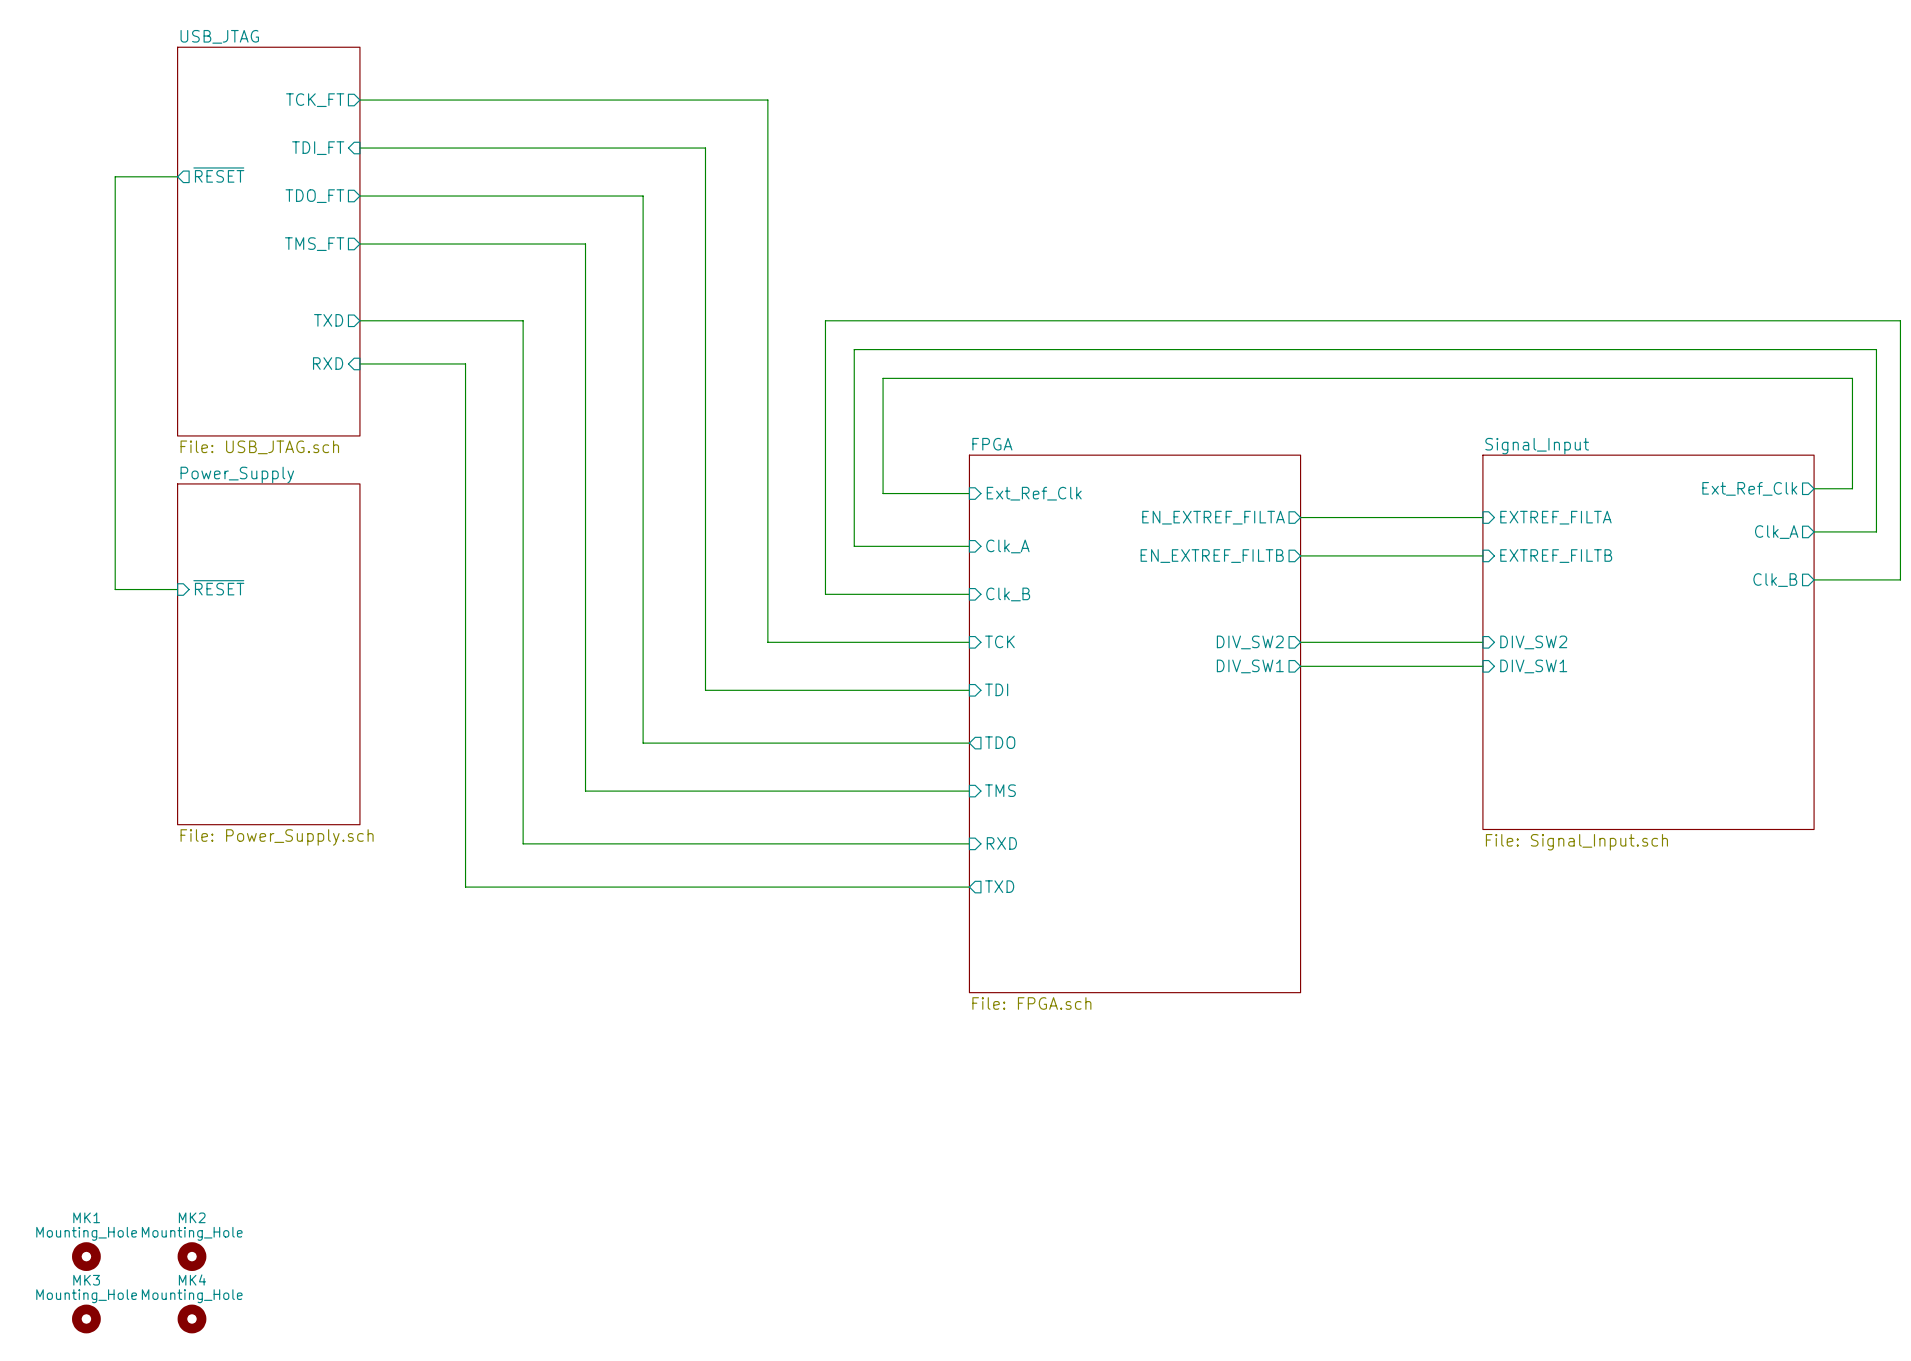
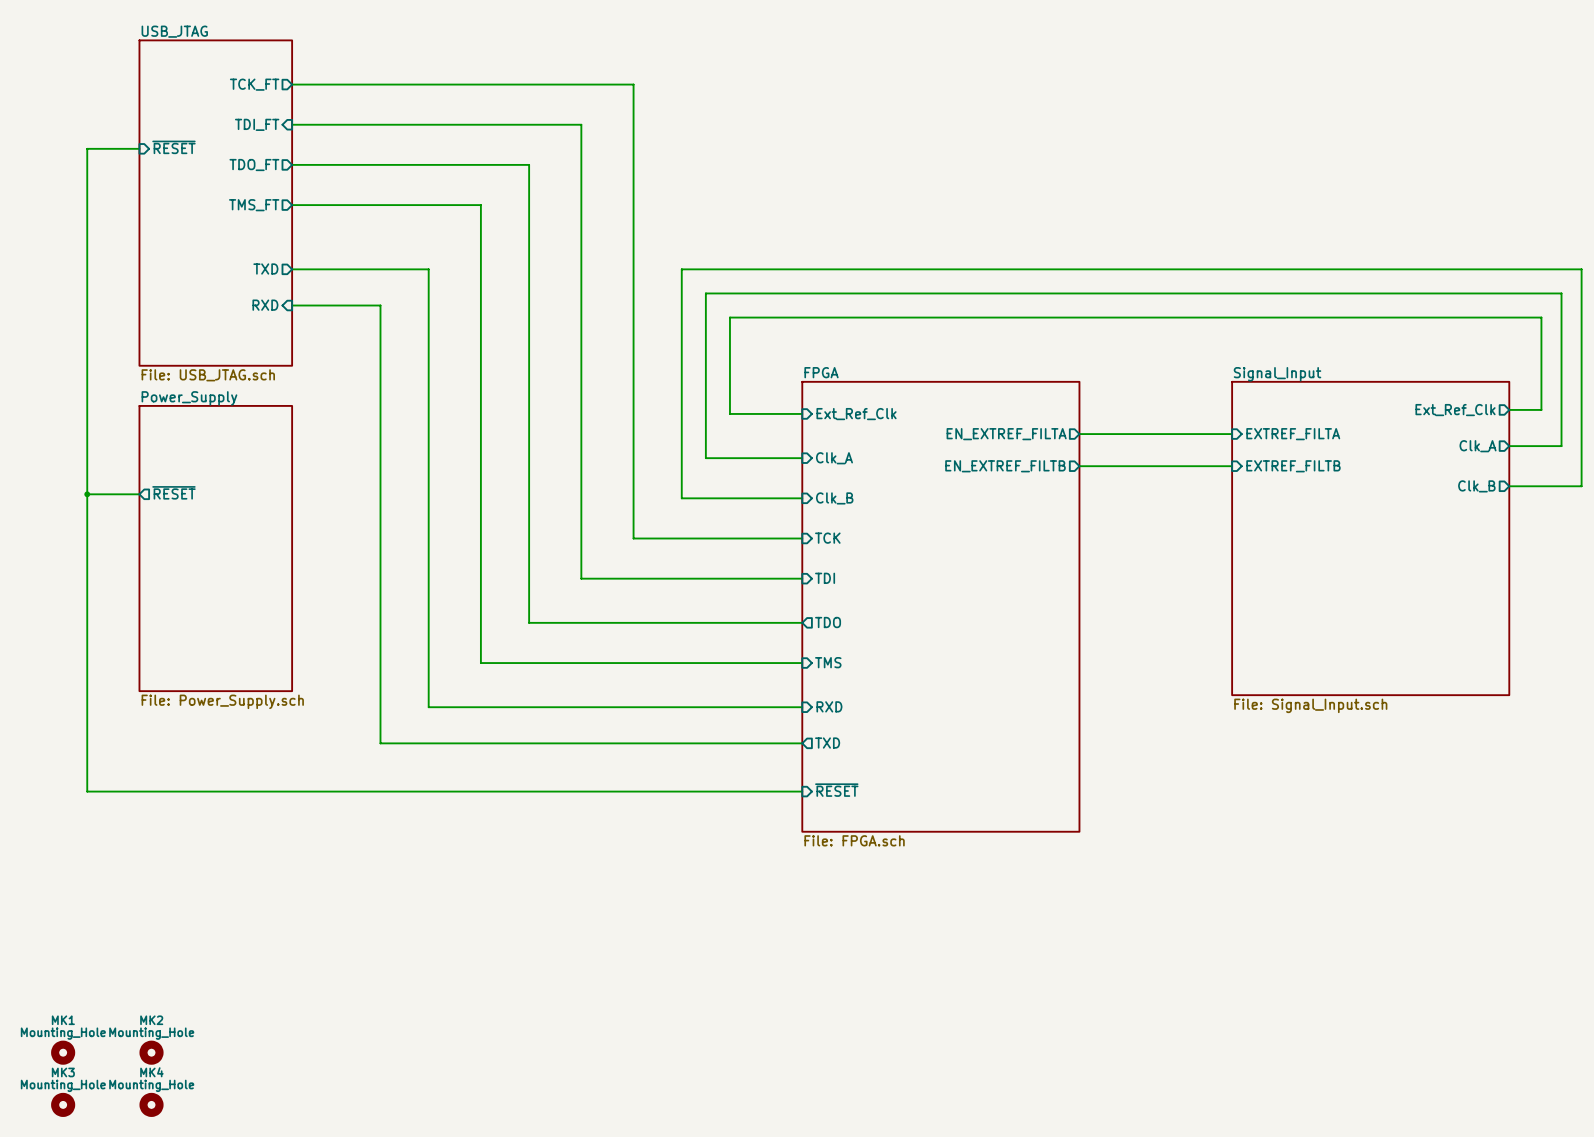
sheet pin shape: output (218, 175) -> input (173, 147)
sheet pin shape: input (218, 587) -> output (173, 492)
wire: none -> (87, 494) (87, 791) (802, 791)
junction: none -> (87, 494)
sheet pin: DIV_SW2 (1250, 642) -> none
wire: (1300, 642) (1482, 642) -> none
sheet pin: DIV_SW2 (1533, 642) -> none
sheet pin: DIV_SW1 (1250, 666) -> none
wire: (1300, 666) (1482, 666) -> none
sheet pin: DIV_SW1 (1533, 666) -> none
sheet pin: none -> ~{RESET} (836, 790)

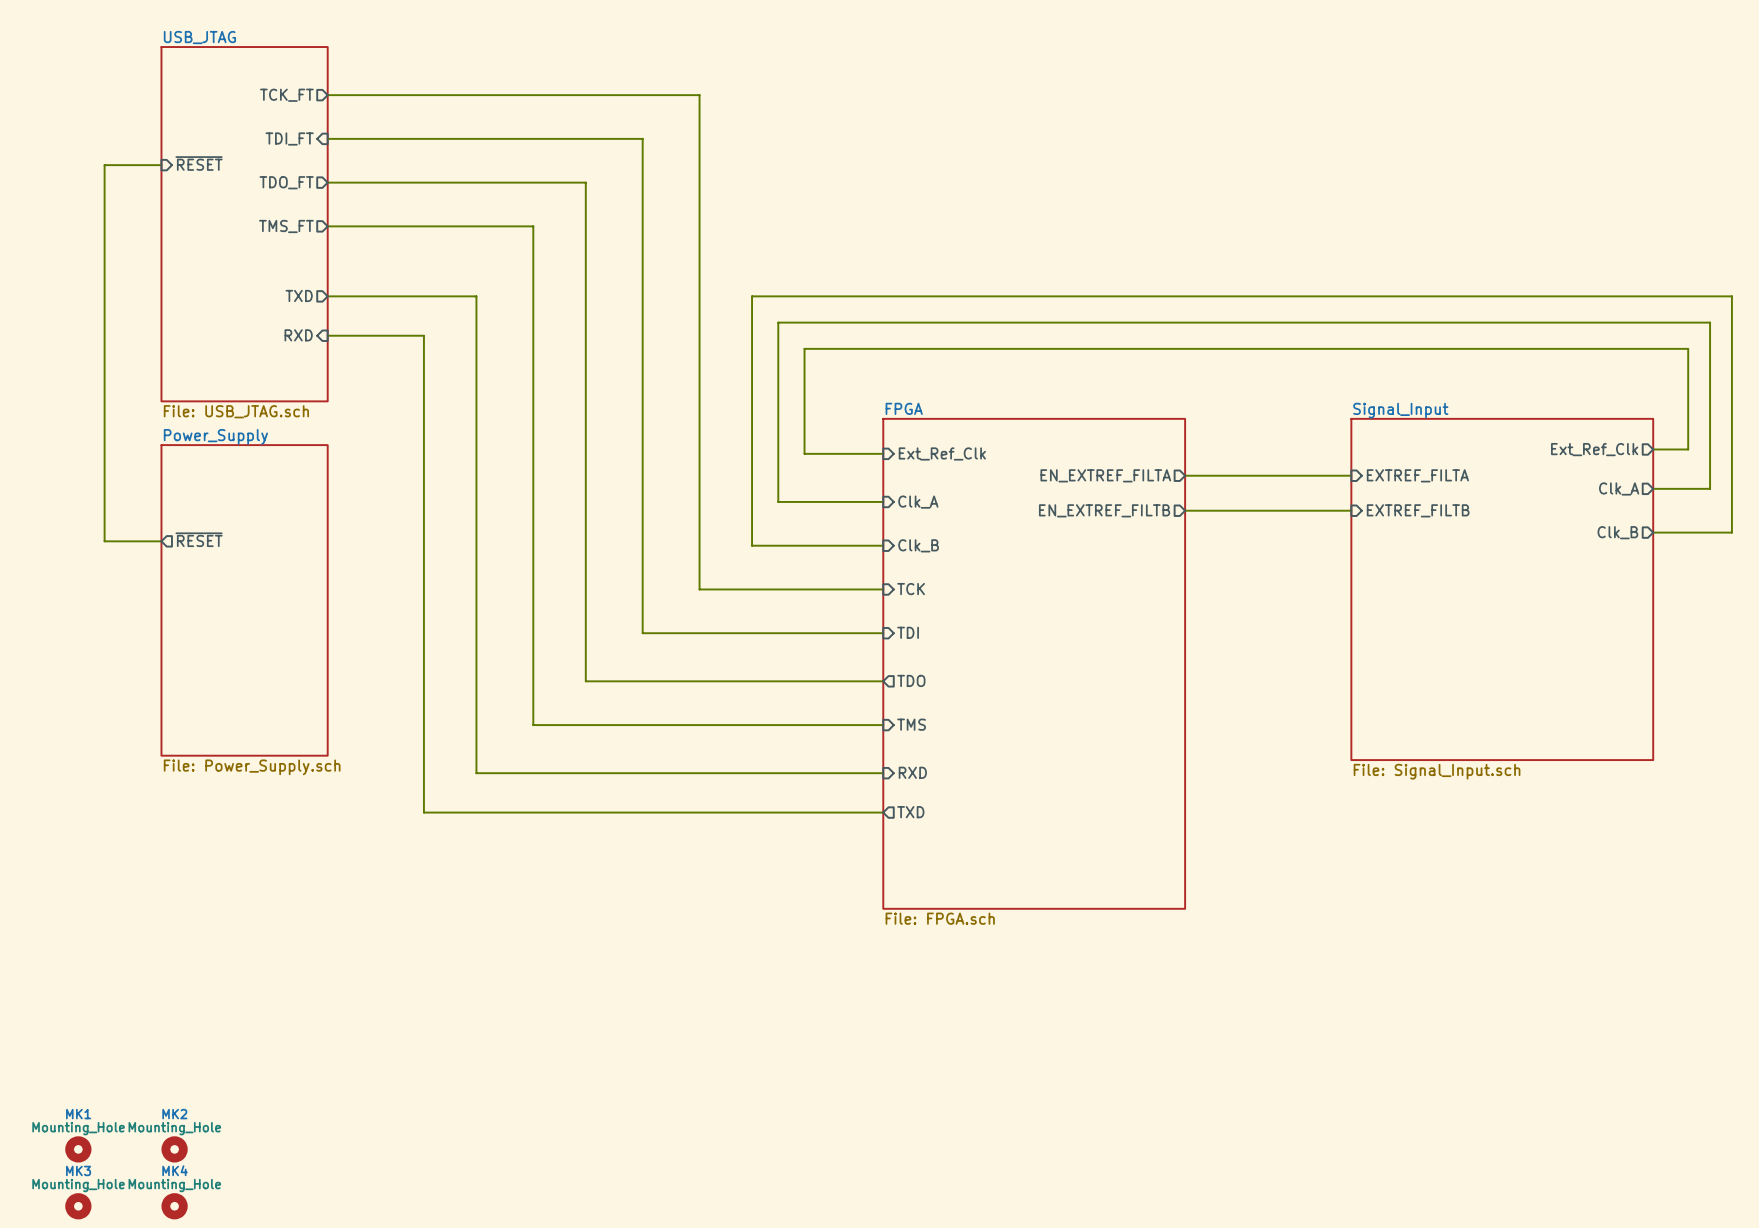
wire: (87, 494) (87, 791) (802, 791) -> none
junction: (87, 494) -> none
sheet pin: ~{RESET} (836, 790) -> none

